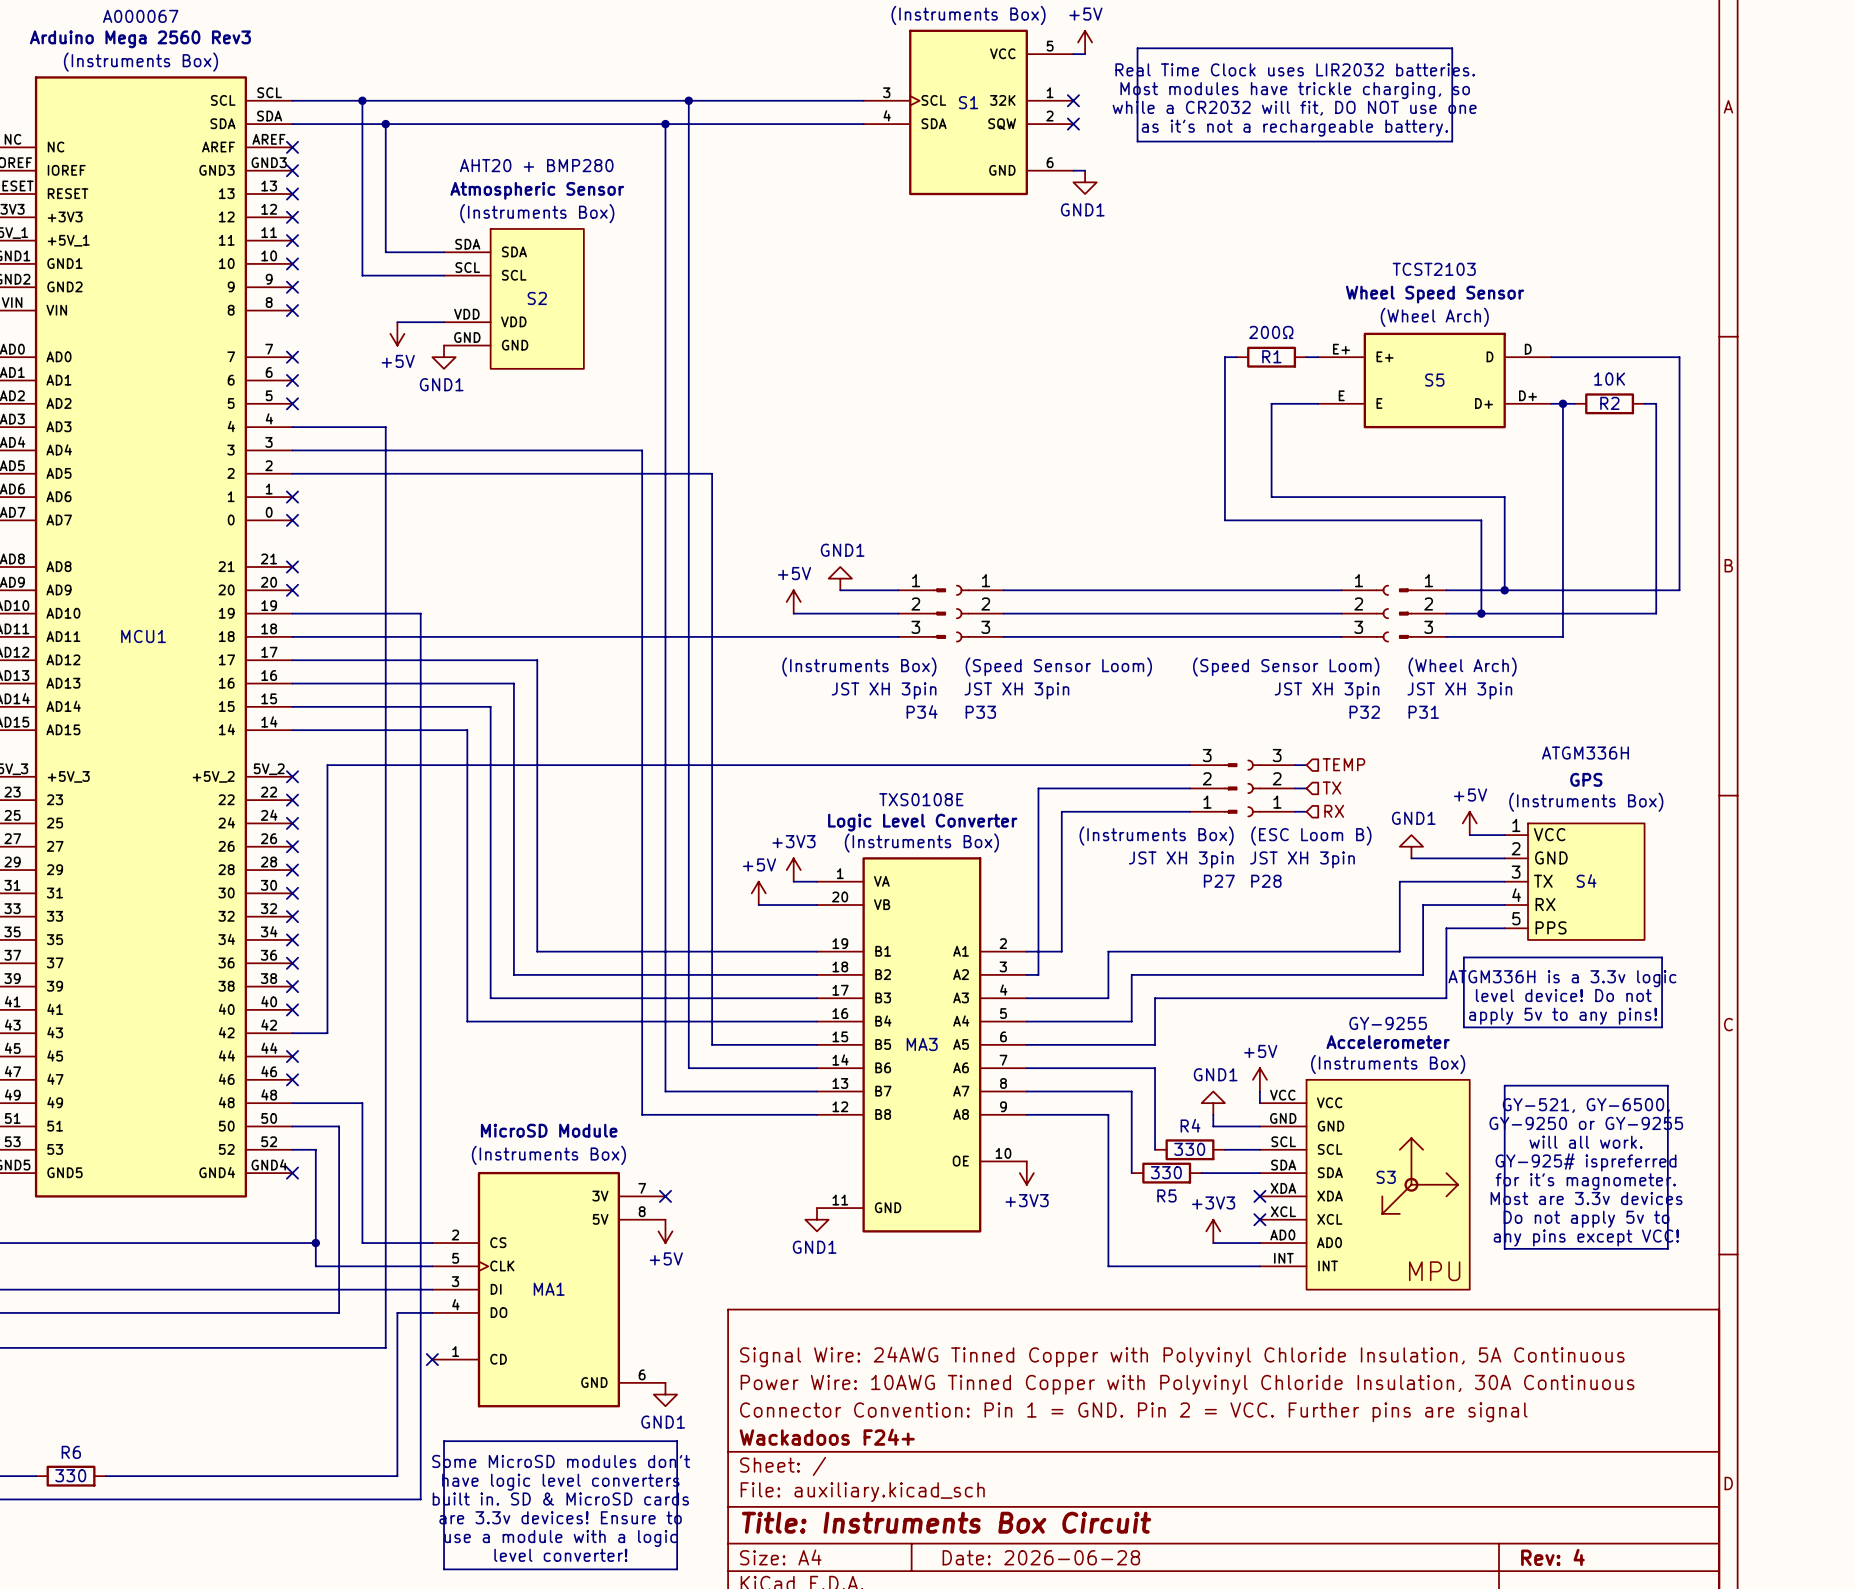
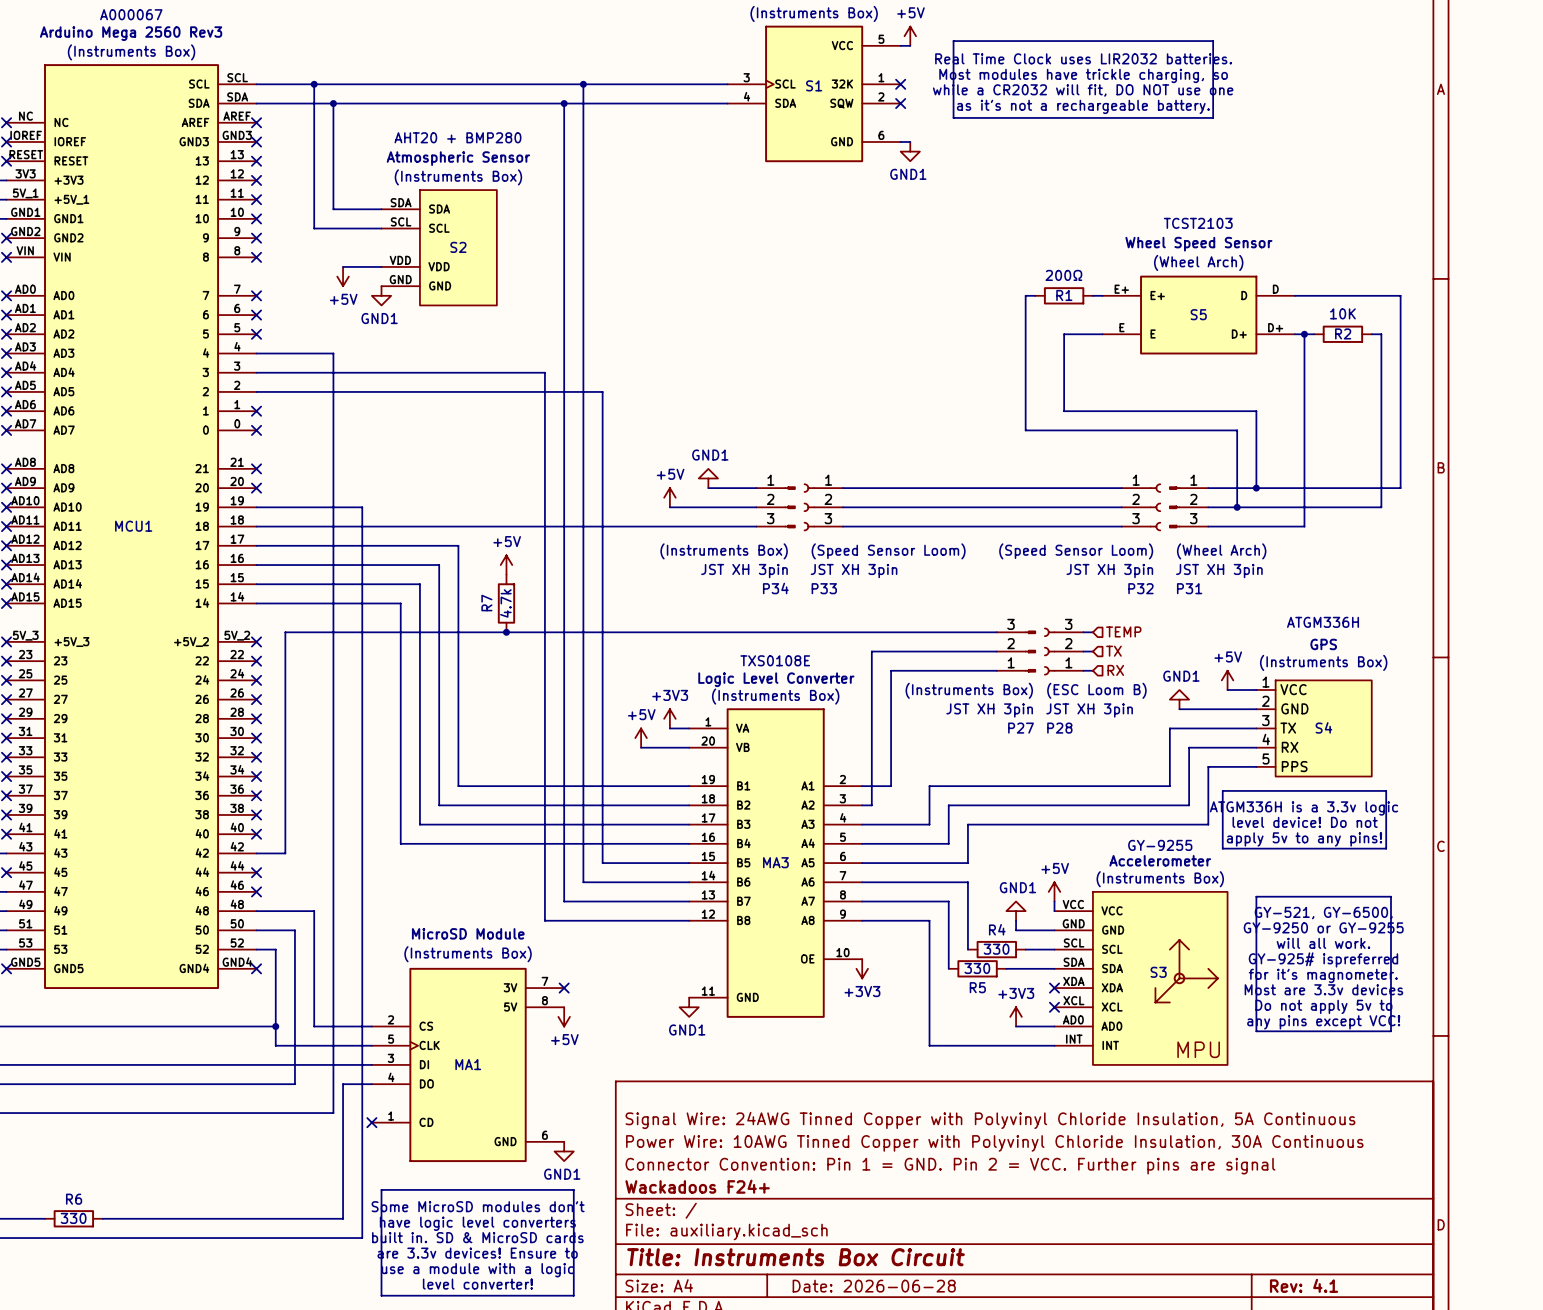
power symbol: none -> +5V (506, 565)
R7: none -> 4.7k (506, 603)
junction: none -> (506, 632)
title block: Rev: 4 (1552, 1557) -> Rev: 4.1 (1304, 1285)

